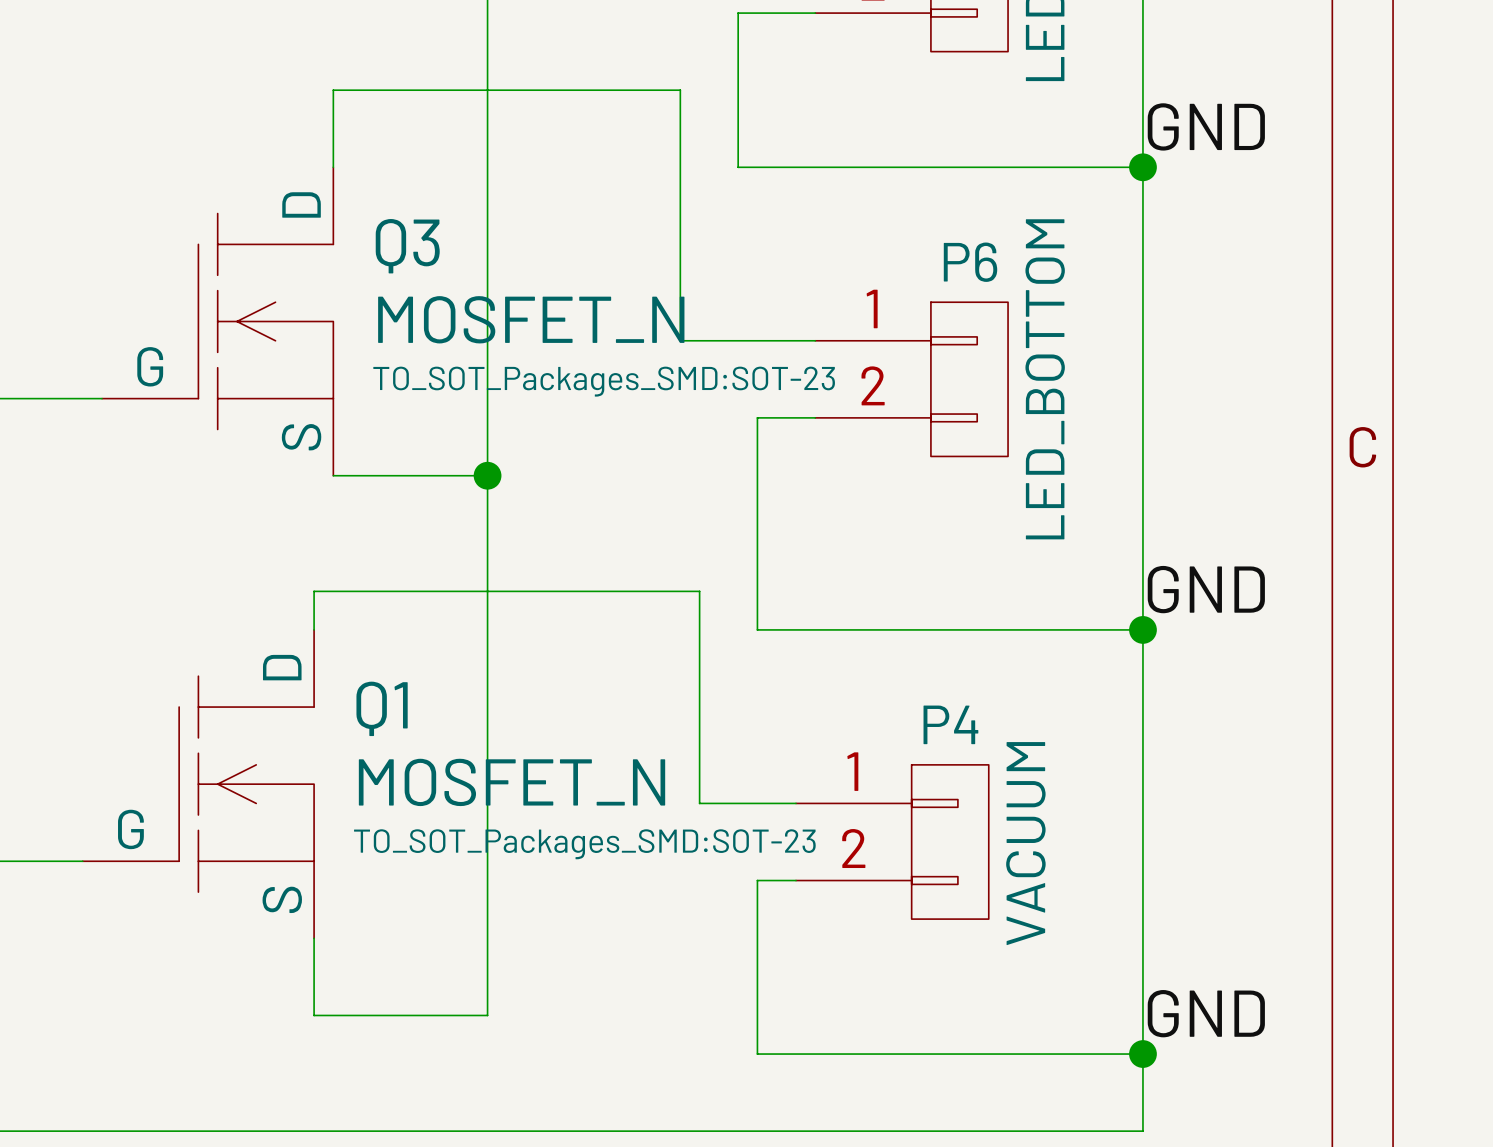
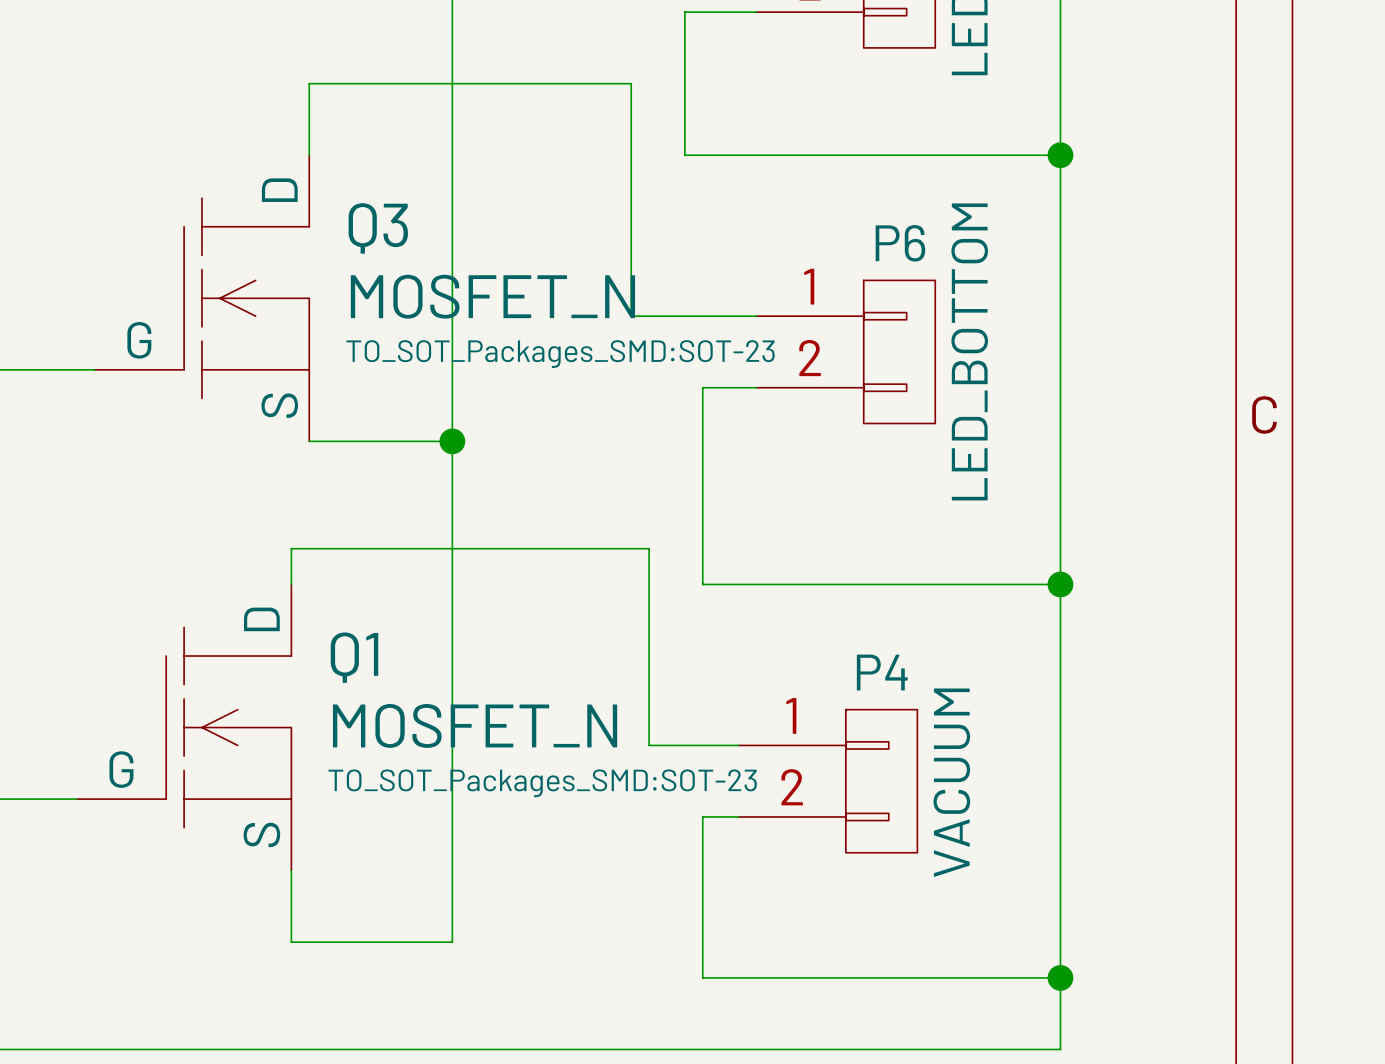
label: GND (1206, 126) -> none
label: GND (1206, 589) -> none
label: GND (1206, 1013) -> none

